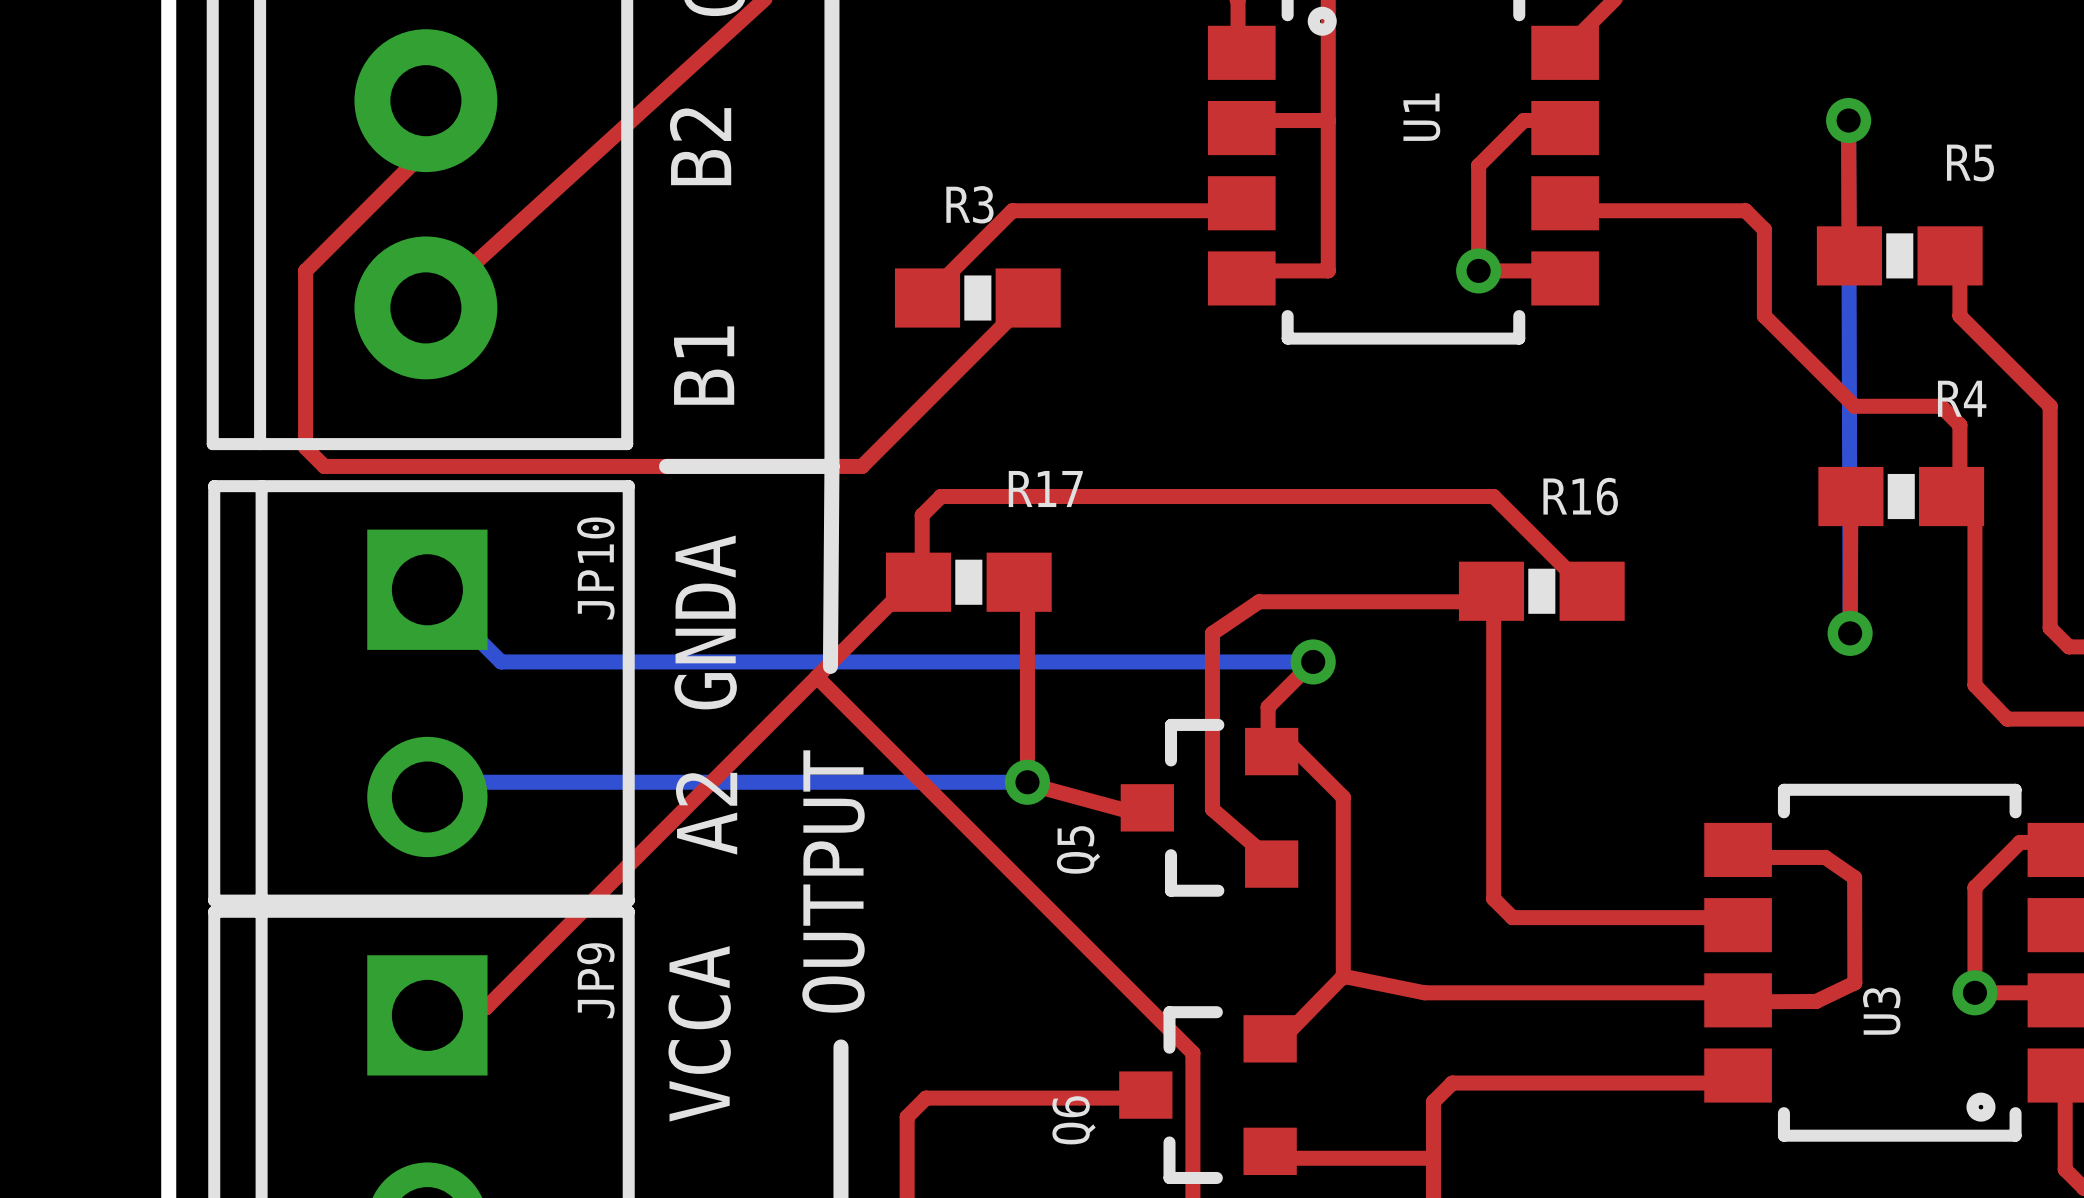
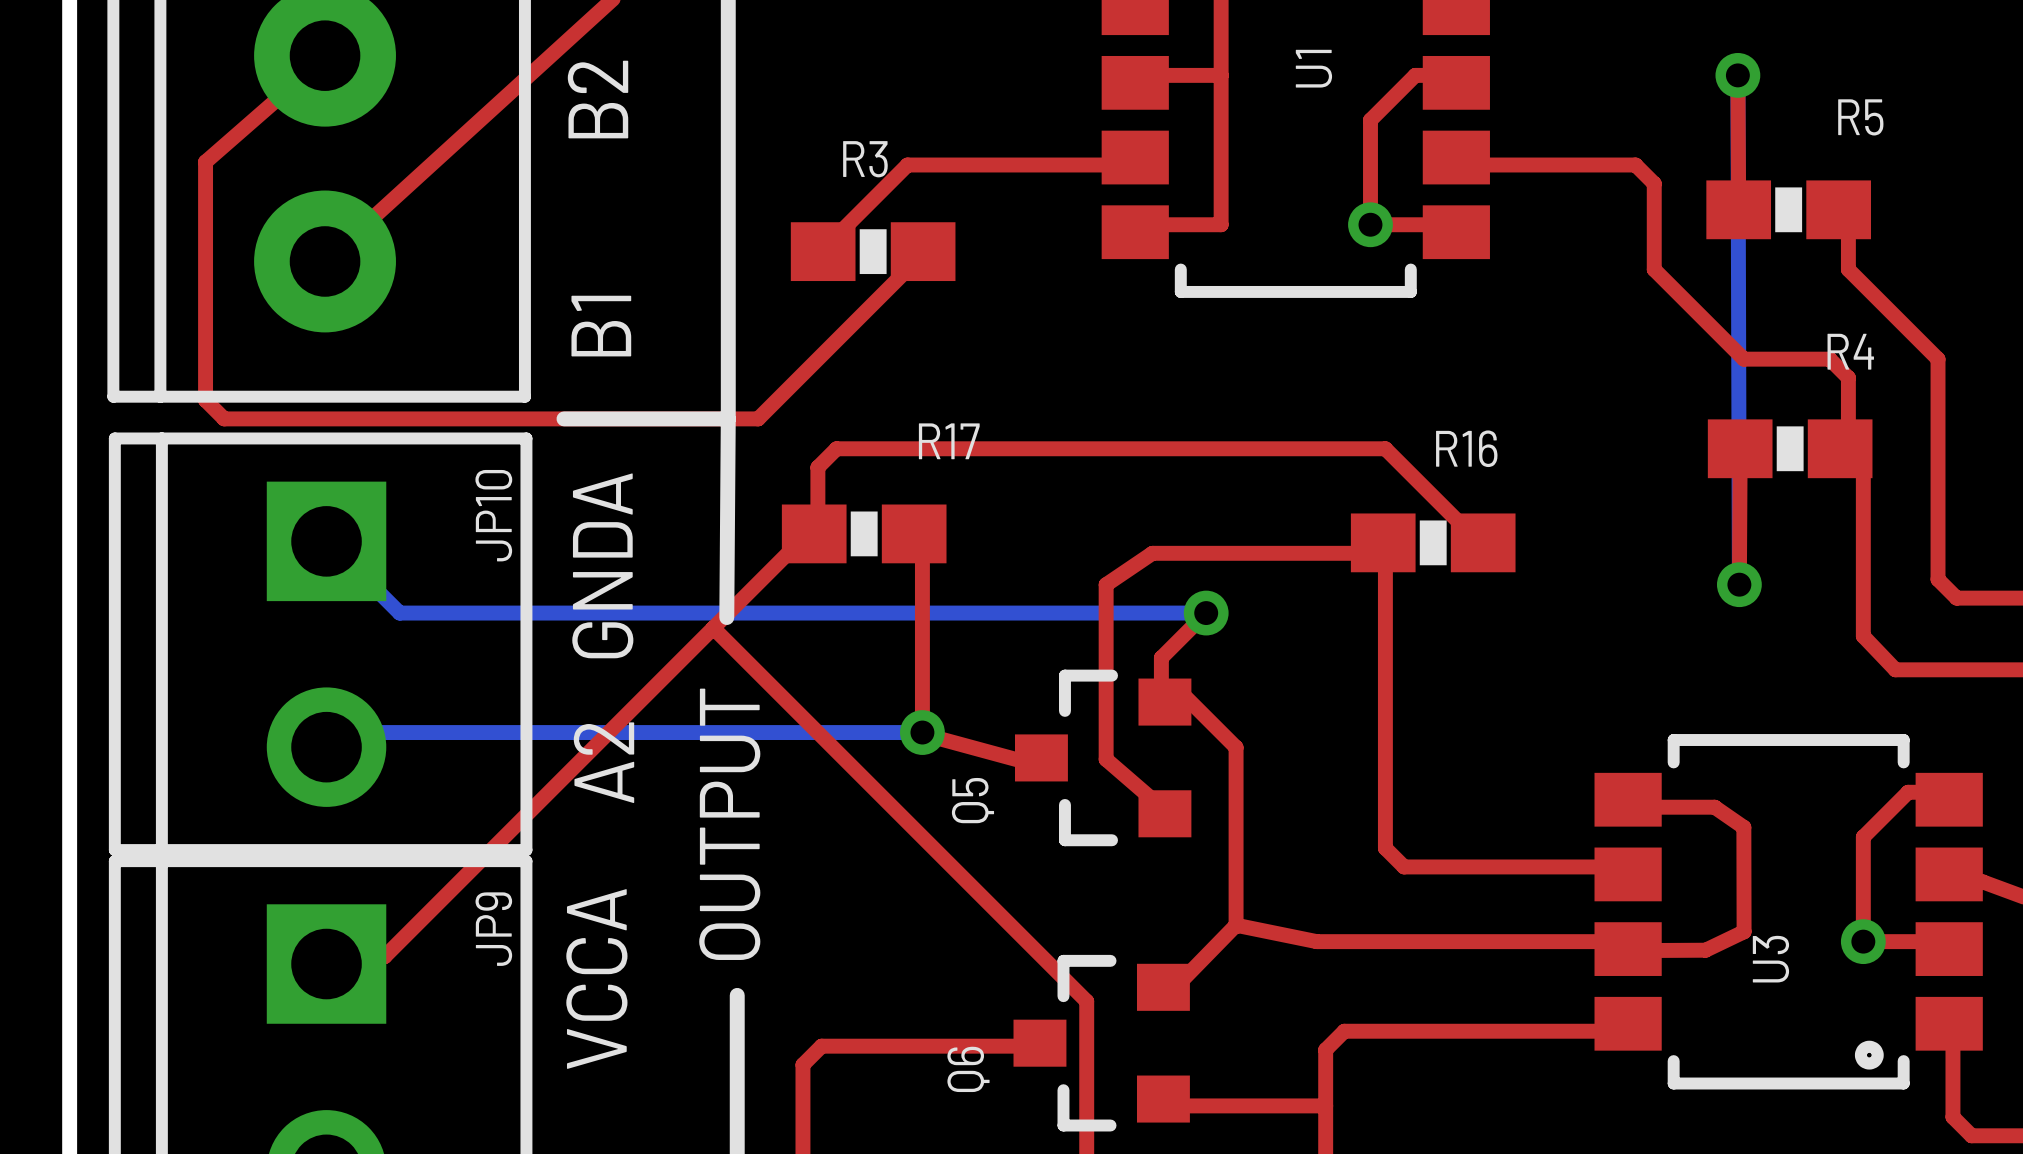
top track: (425, 100) (425, 150) (305, 270) -> (325, 55) (335, 48) (205, 162) (205, 224)

